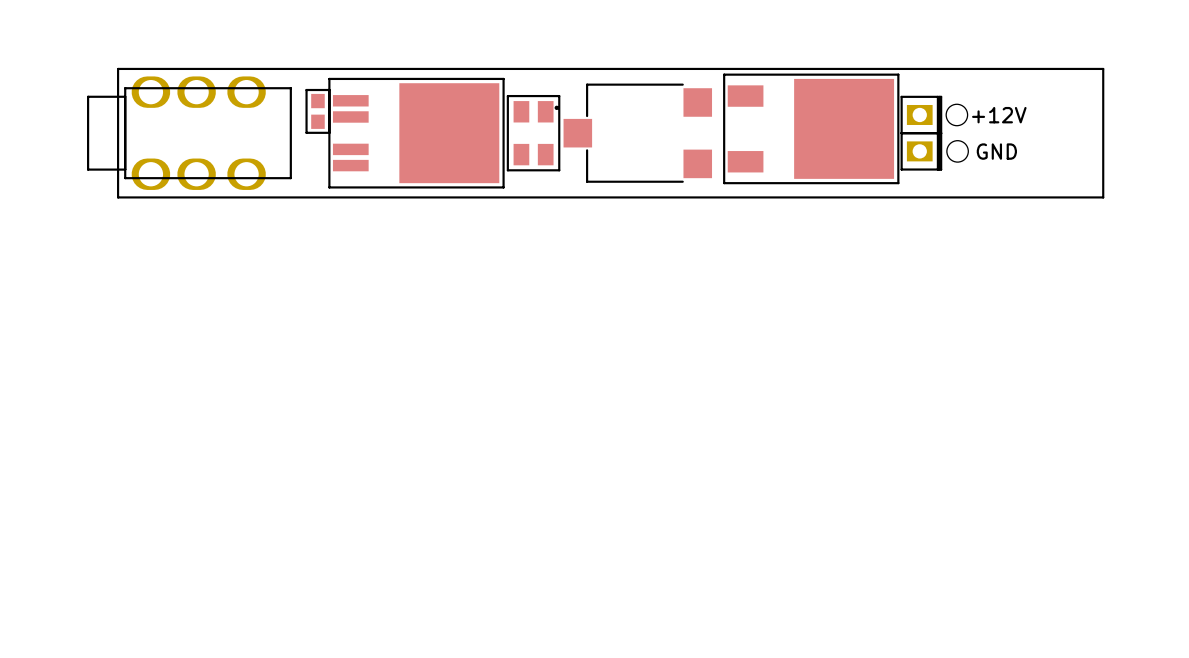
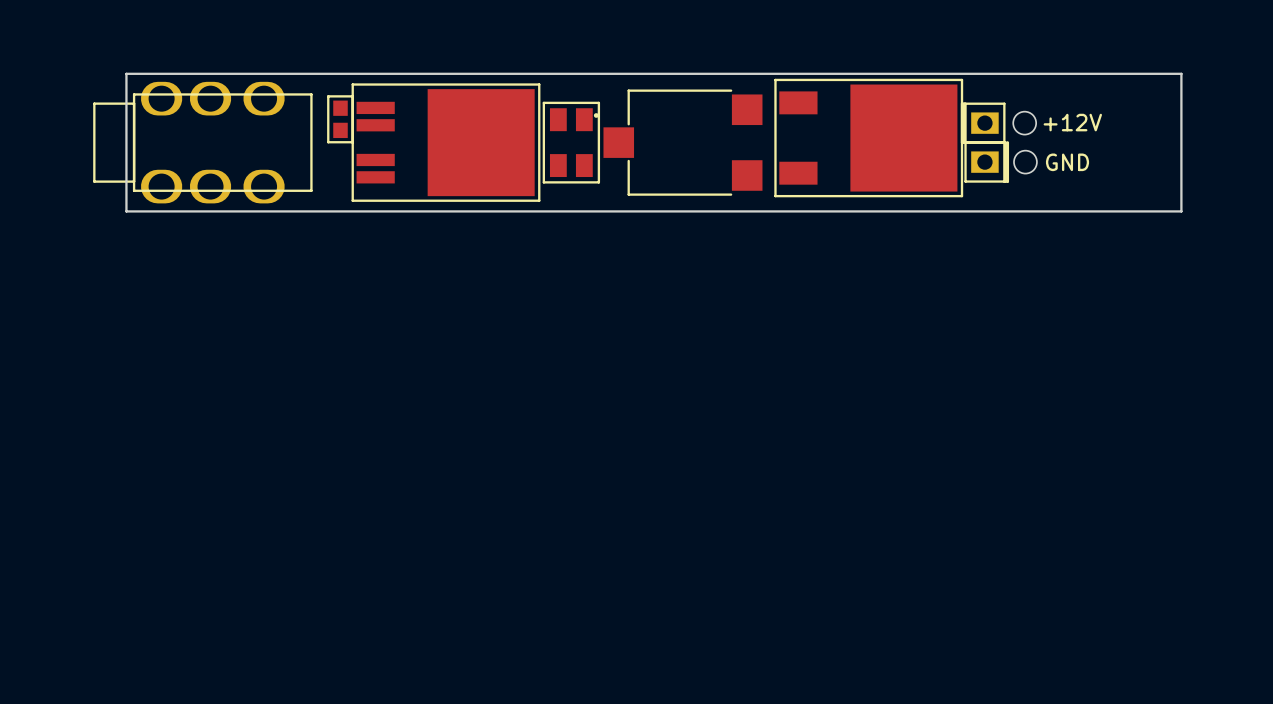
part rotation: 0° (921, 114) -> 180° (983, 123)

